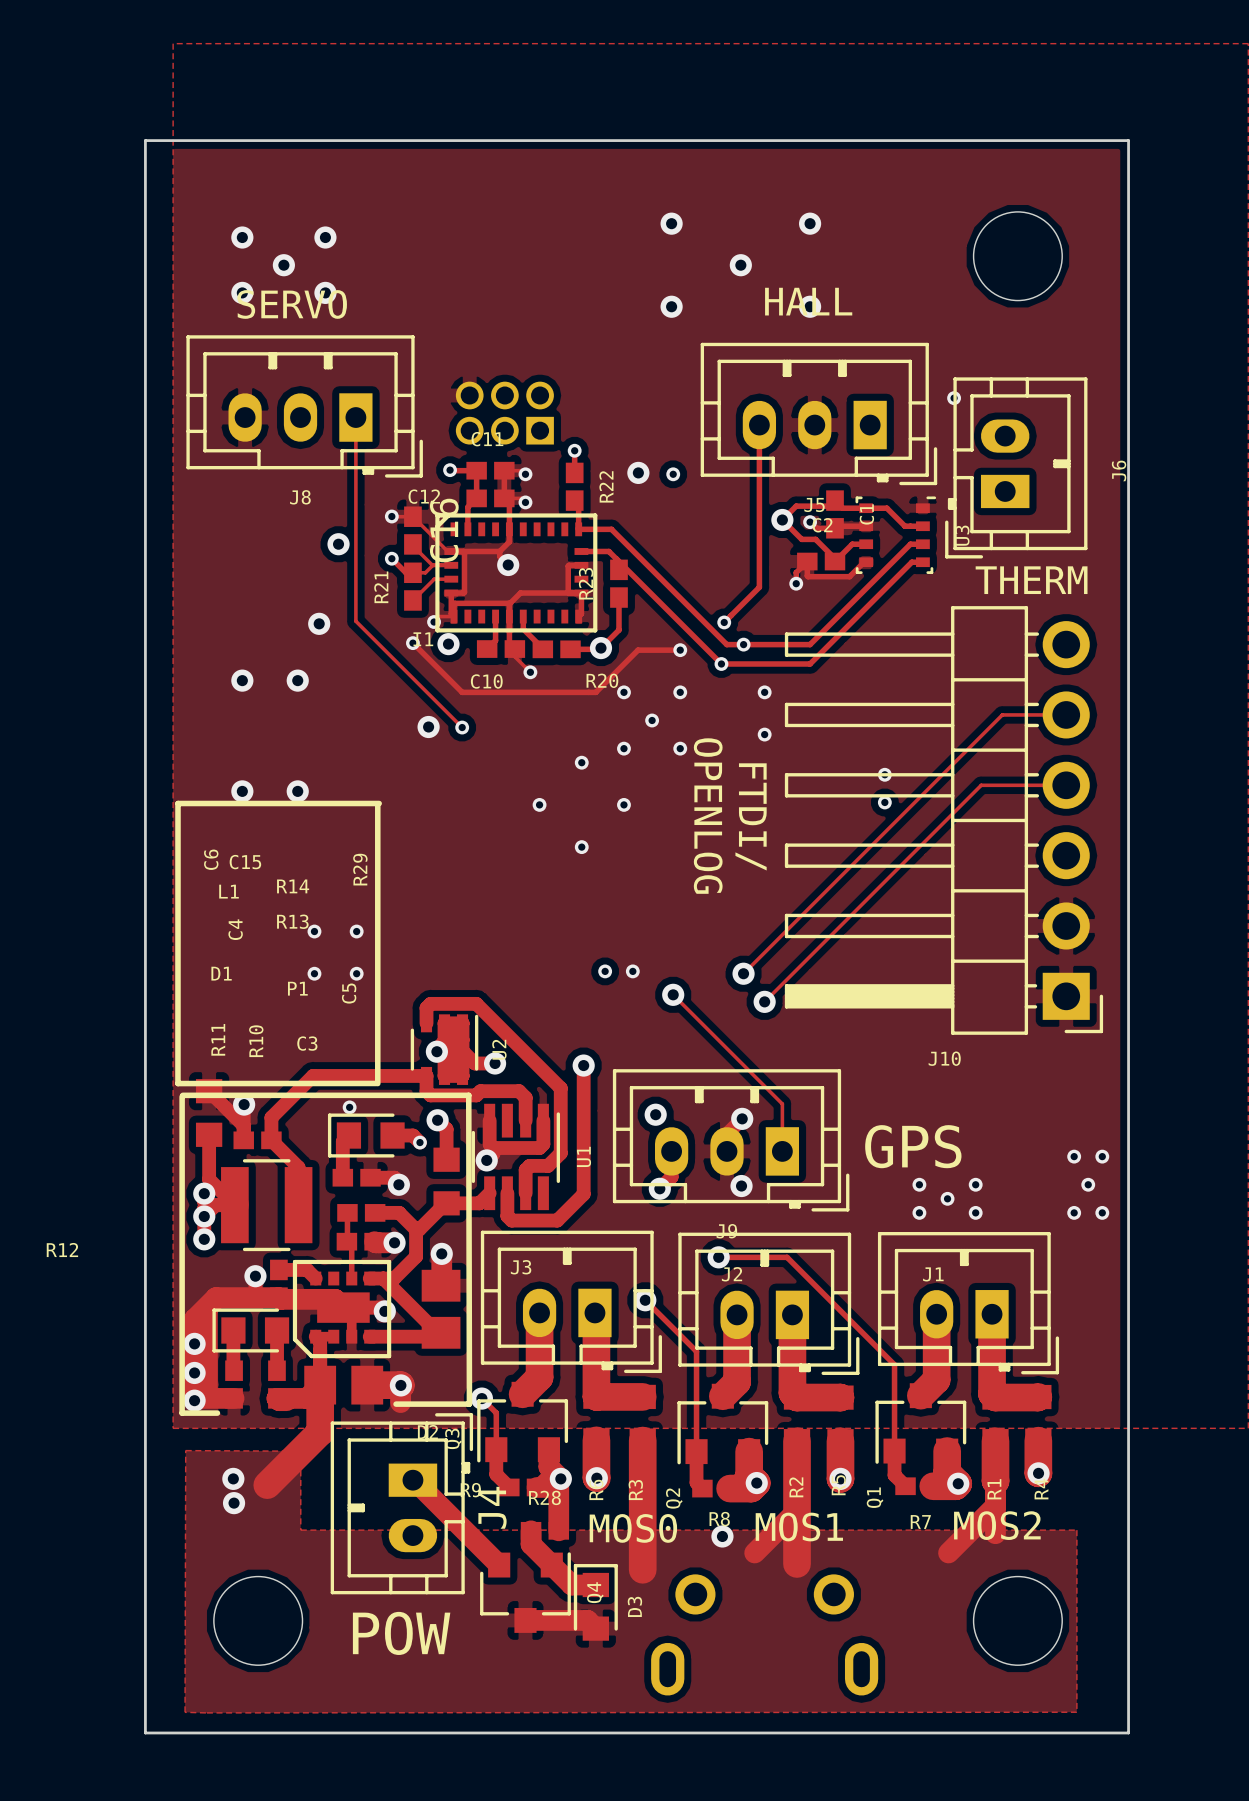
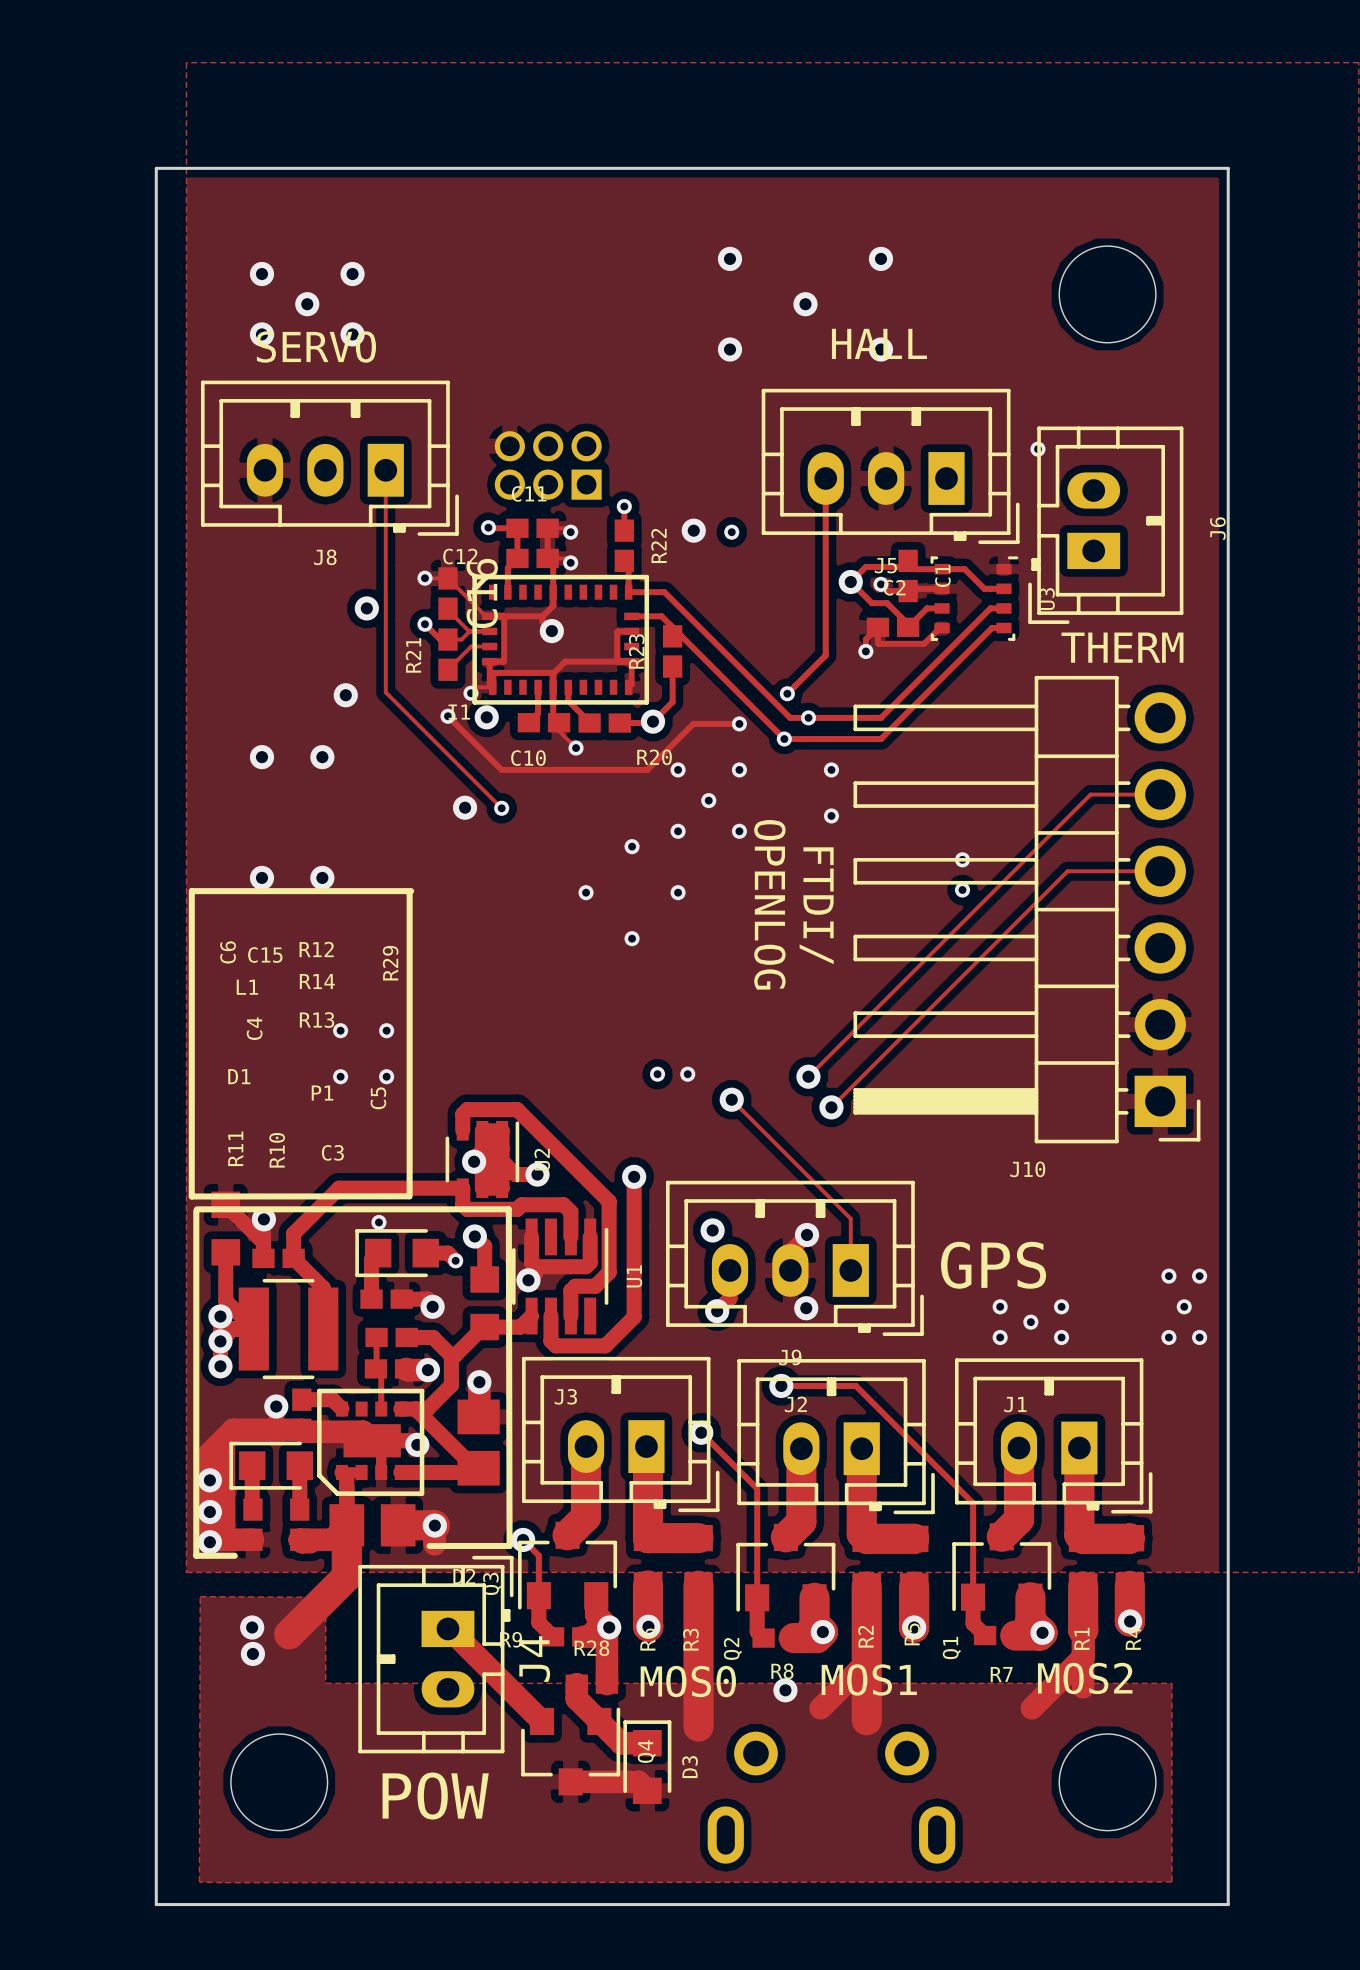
R12 name position: R12 (62, 1250) -> R12 (316, 949)

